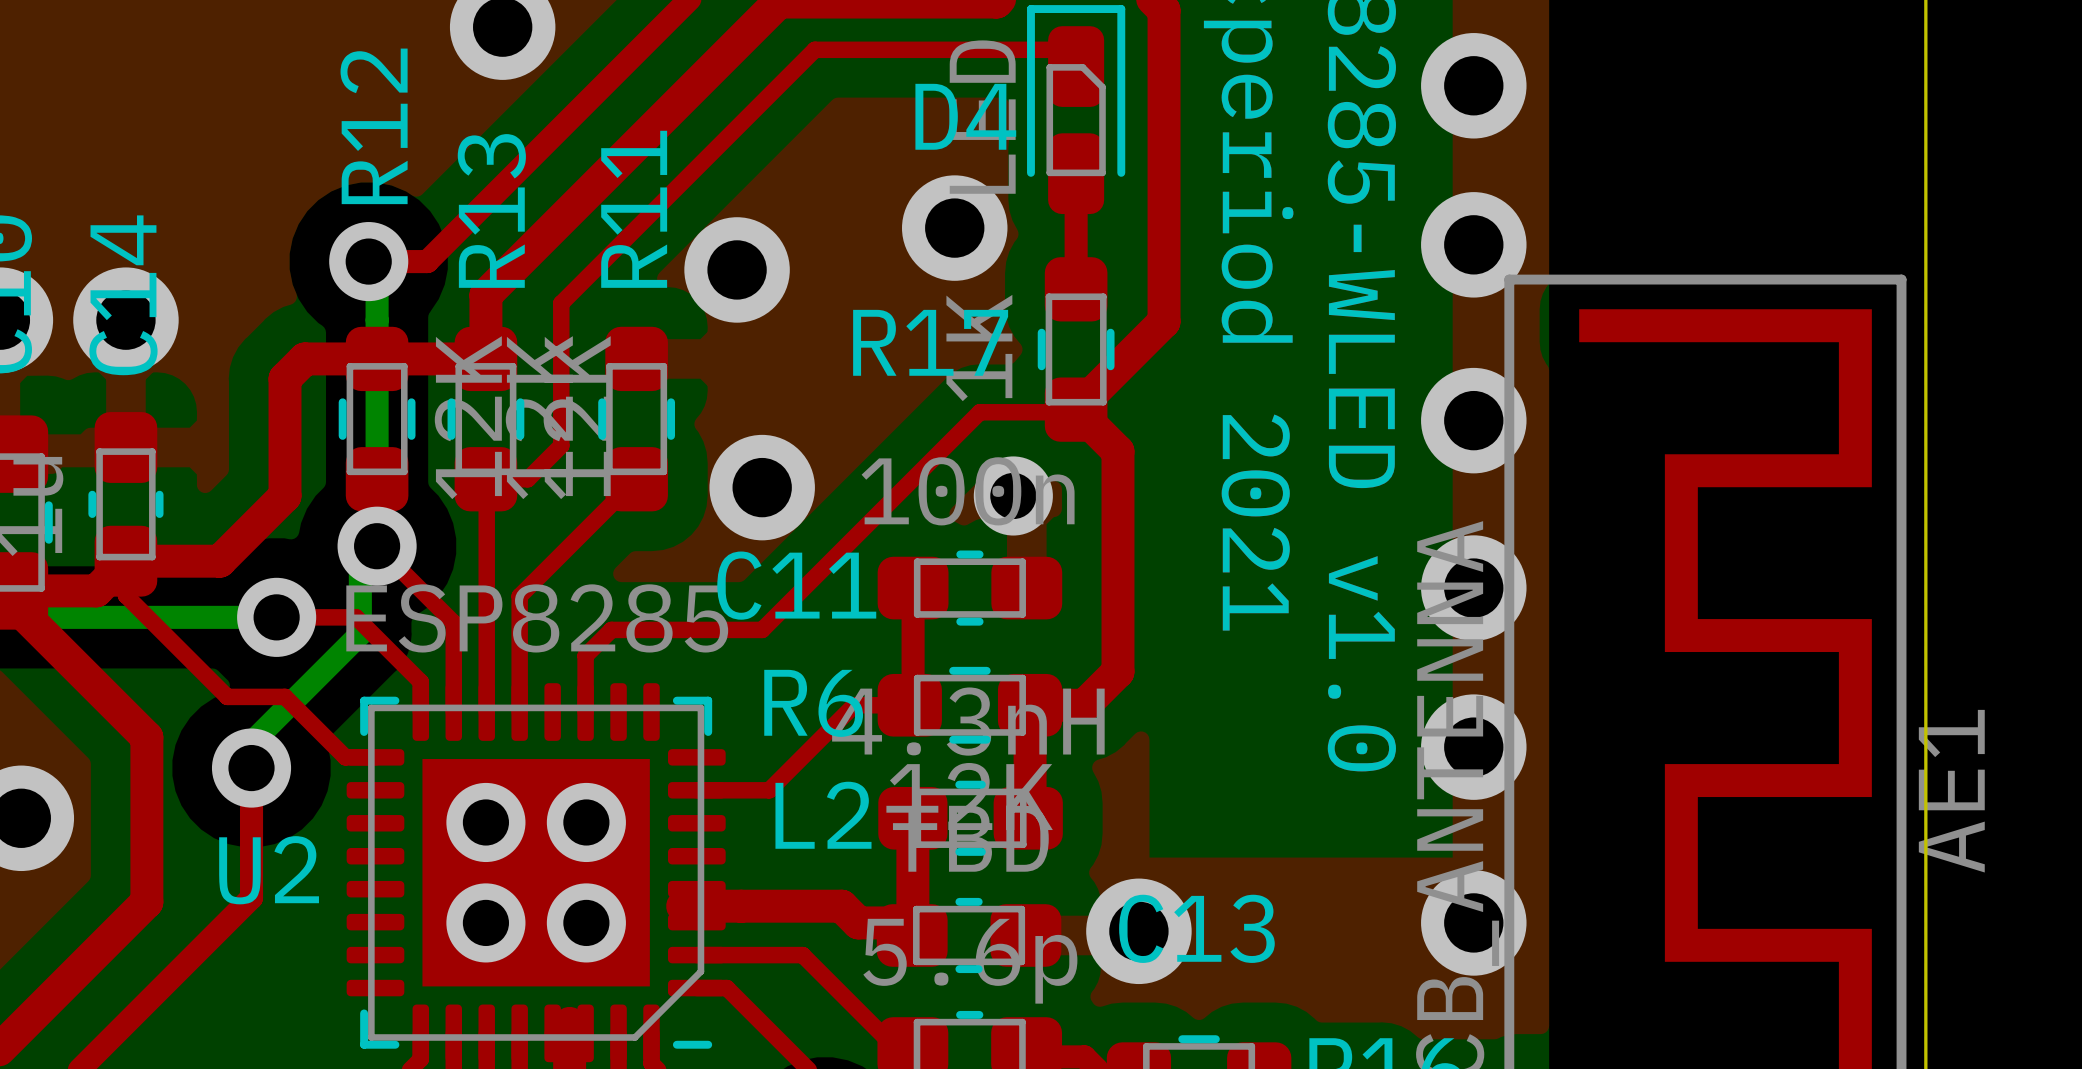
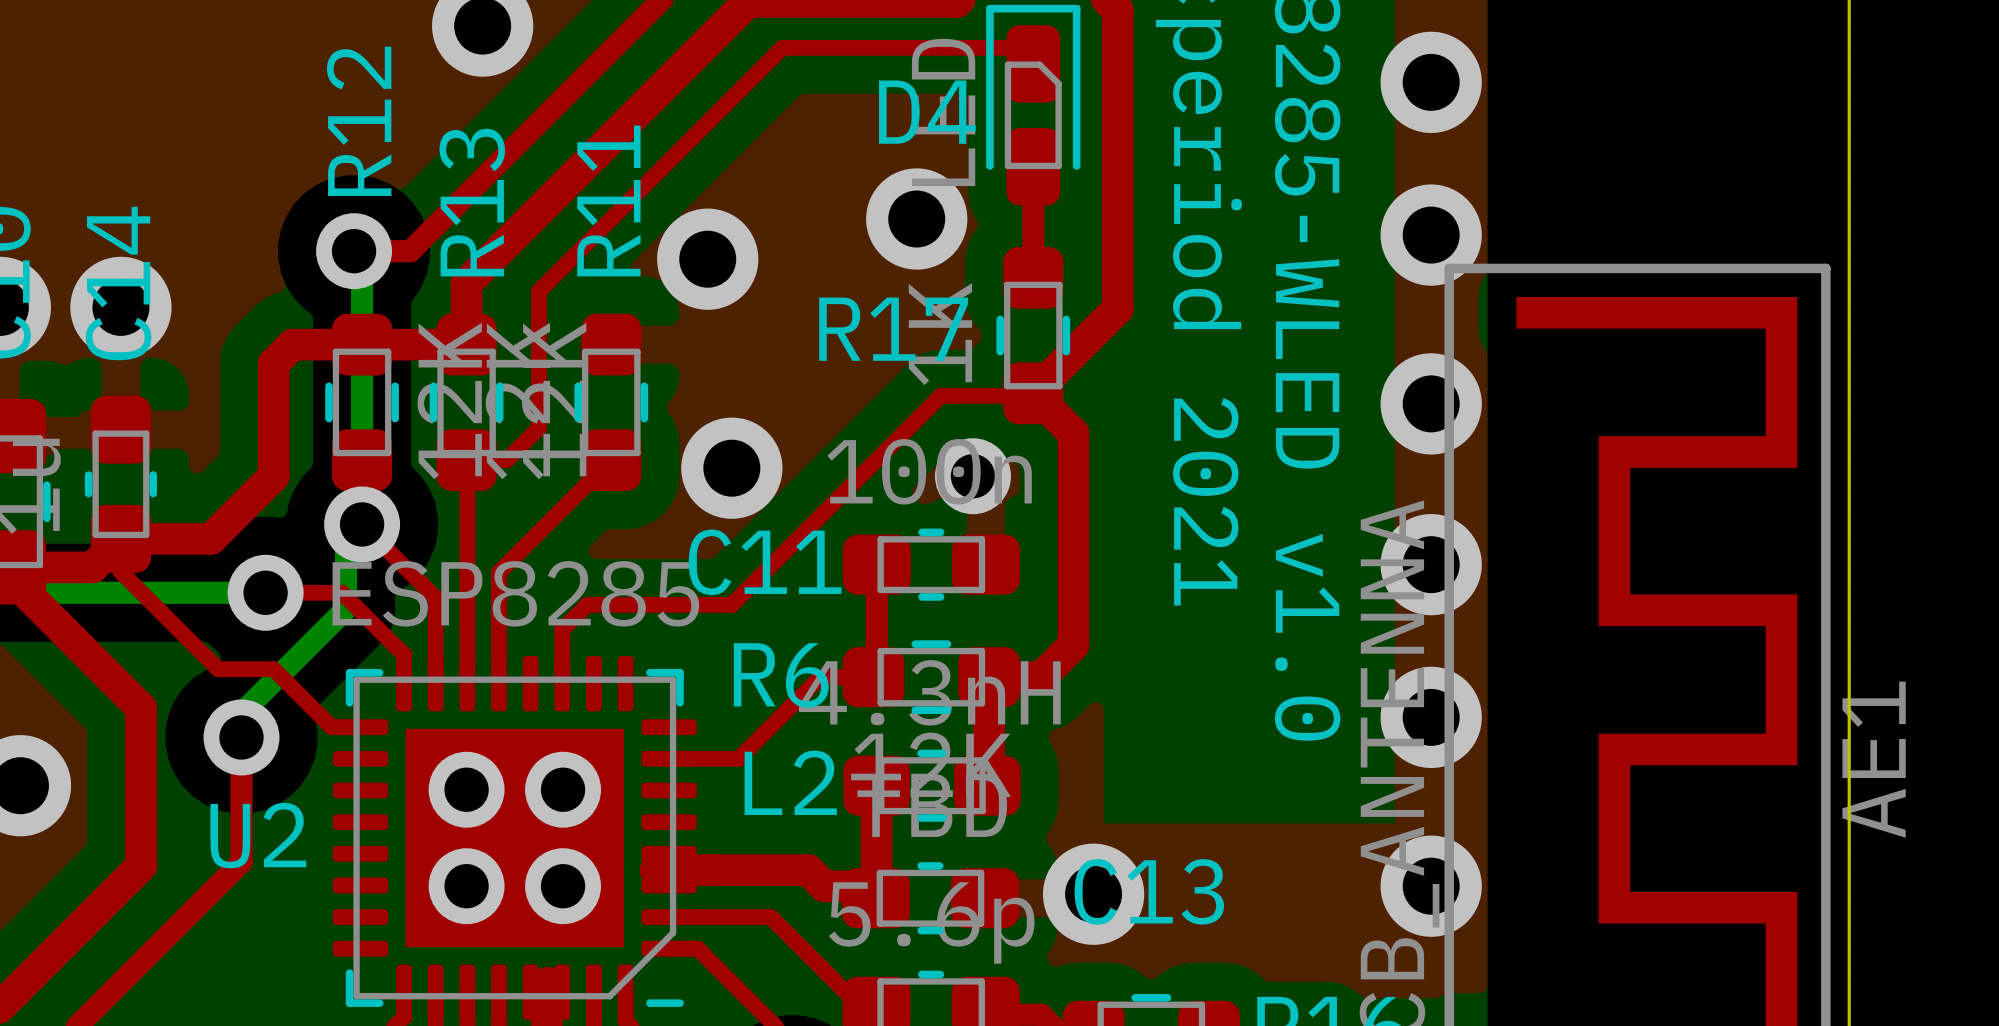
via position: (1473, 85) -> (1431, 82)
via position: (1473, 244) -> (1431, 235)
via position: (1473, 420) -> (1431, 403)
via position: (1473, 588) -> (1431, 564)
via position: (1473, 747) -> (1431, 717)
via position: (1473, 922) -> (1431, 886)

